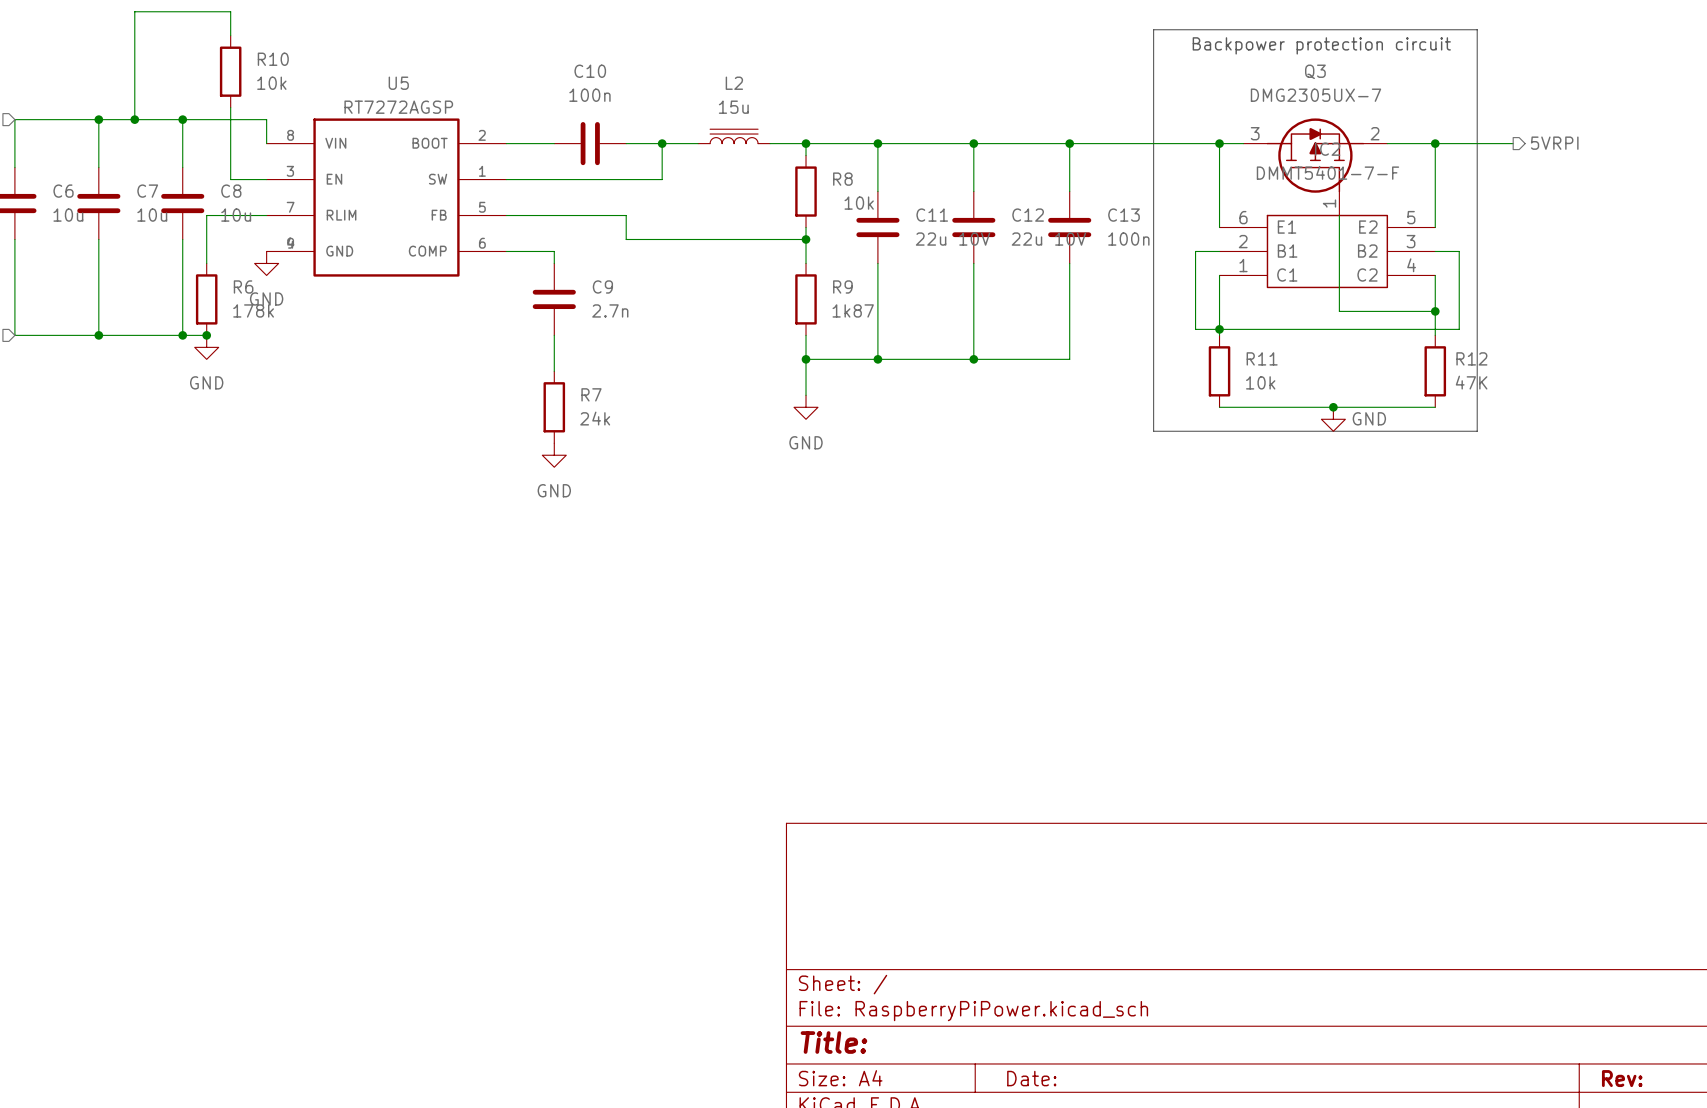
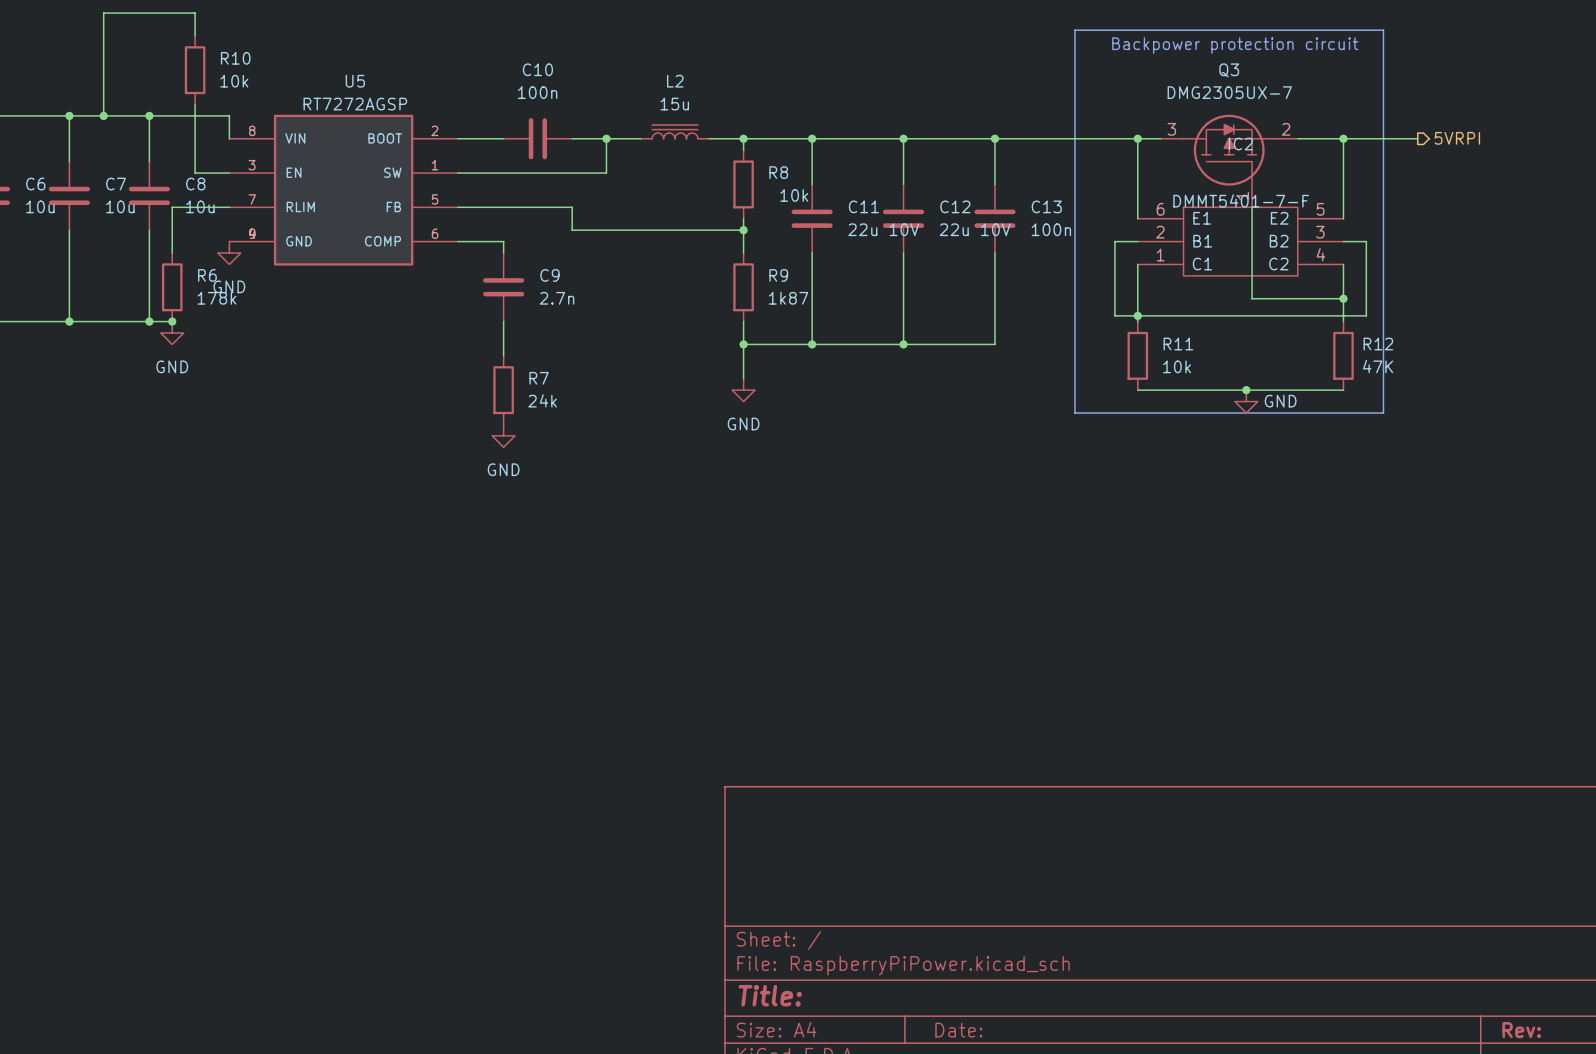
IC2 value position: DMMT5401-7-F (1327, 172) -> DMMT5401-7-F (1241, 200)

